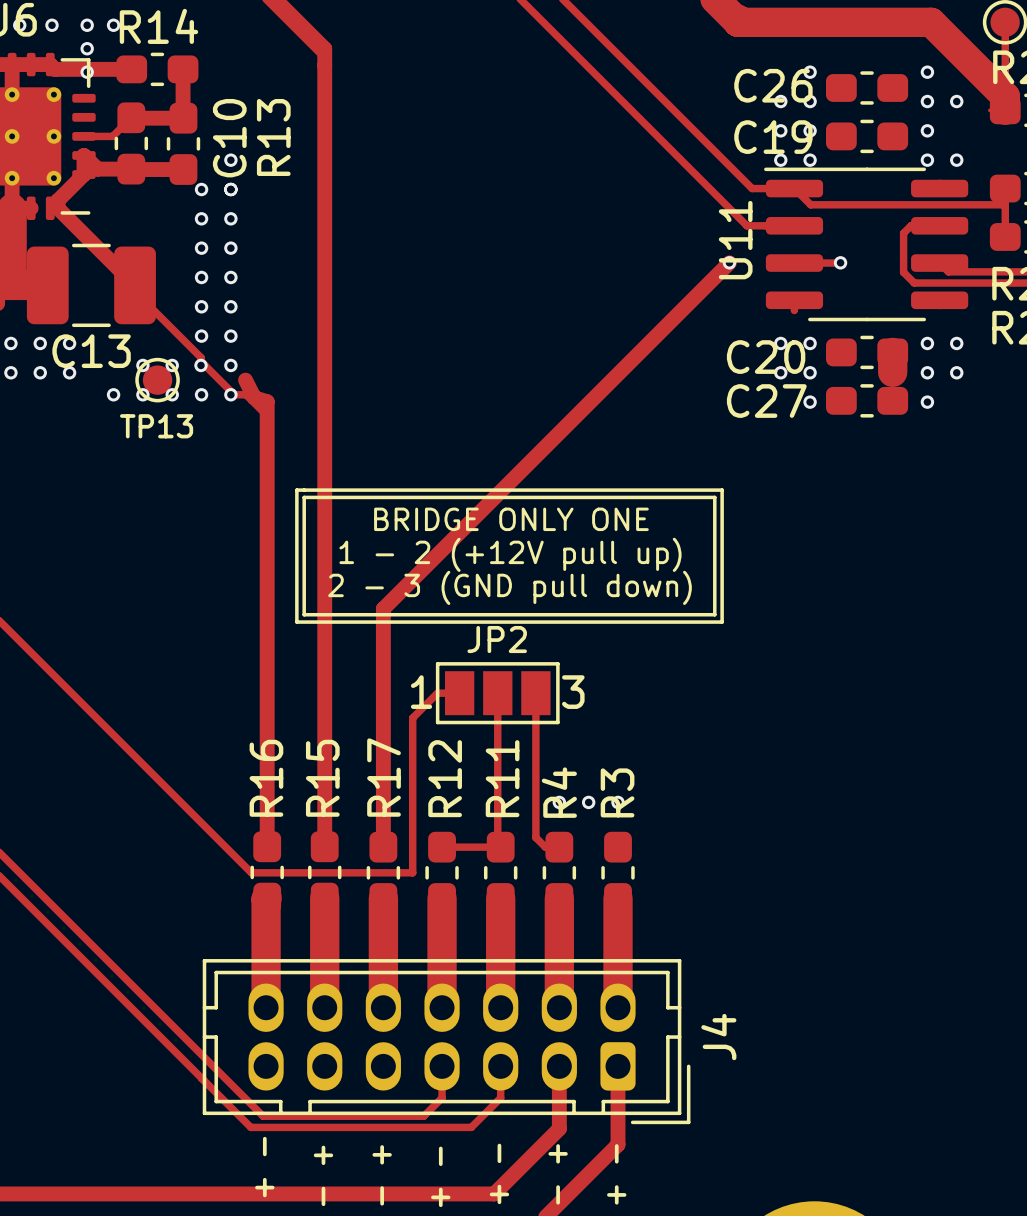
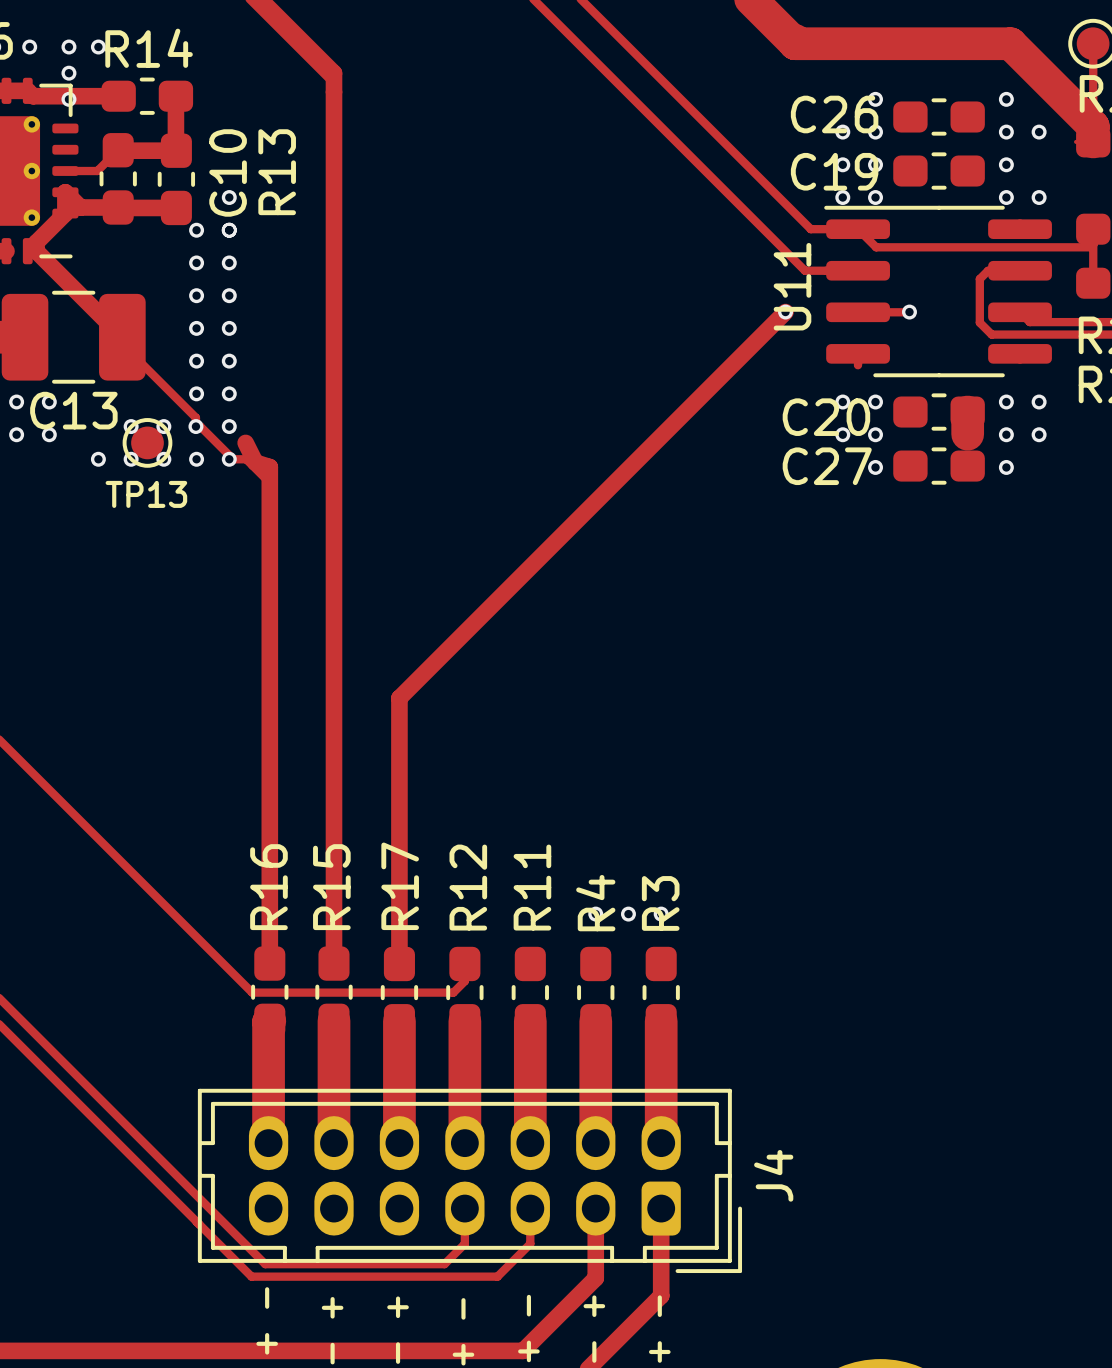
line: (296, 490) (722, 490) (722, 622) (296, 622) (296, 490) -> none
line: (304, 497) (304, 614) (714, 614) (714, 497) (304, 497) -> none
text: BRIDGE ONLY ONE (511, 519) -> none
text: 1 - 2 (+12V pull up) (510, 554) -> none
text: 2 - 3 (GND pull down) (509, 587) -> none
track: (459, 693) (437, 693) (412, 718) (412, 872) -> (464, 963) (464, 981) (453, 992) (432, 992)
track: (497, 693) (497, 844) (500, 847) (442, 847) -> none
JP2: (497, 693) -> none
track: (535, 693) (535, 837) (545, 847) (559, 847) -> none

